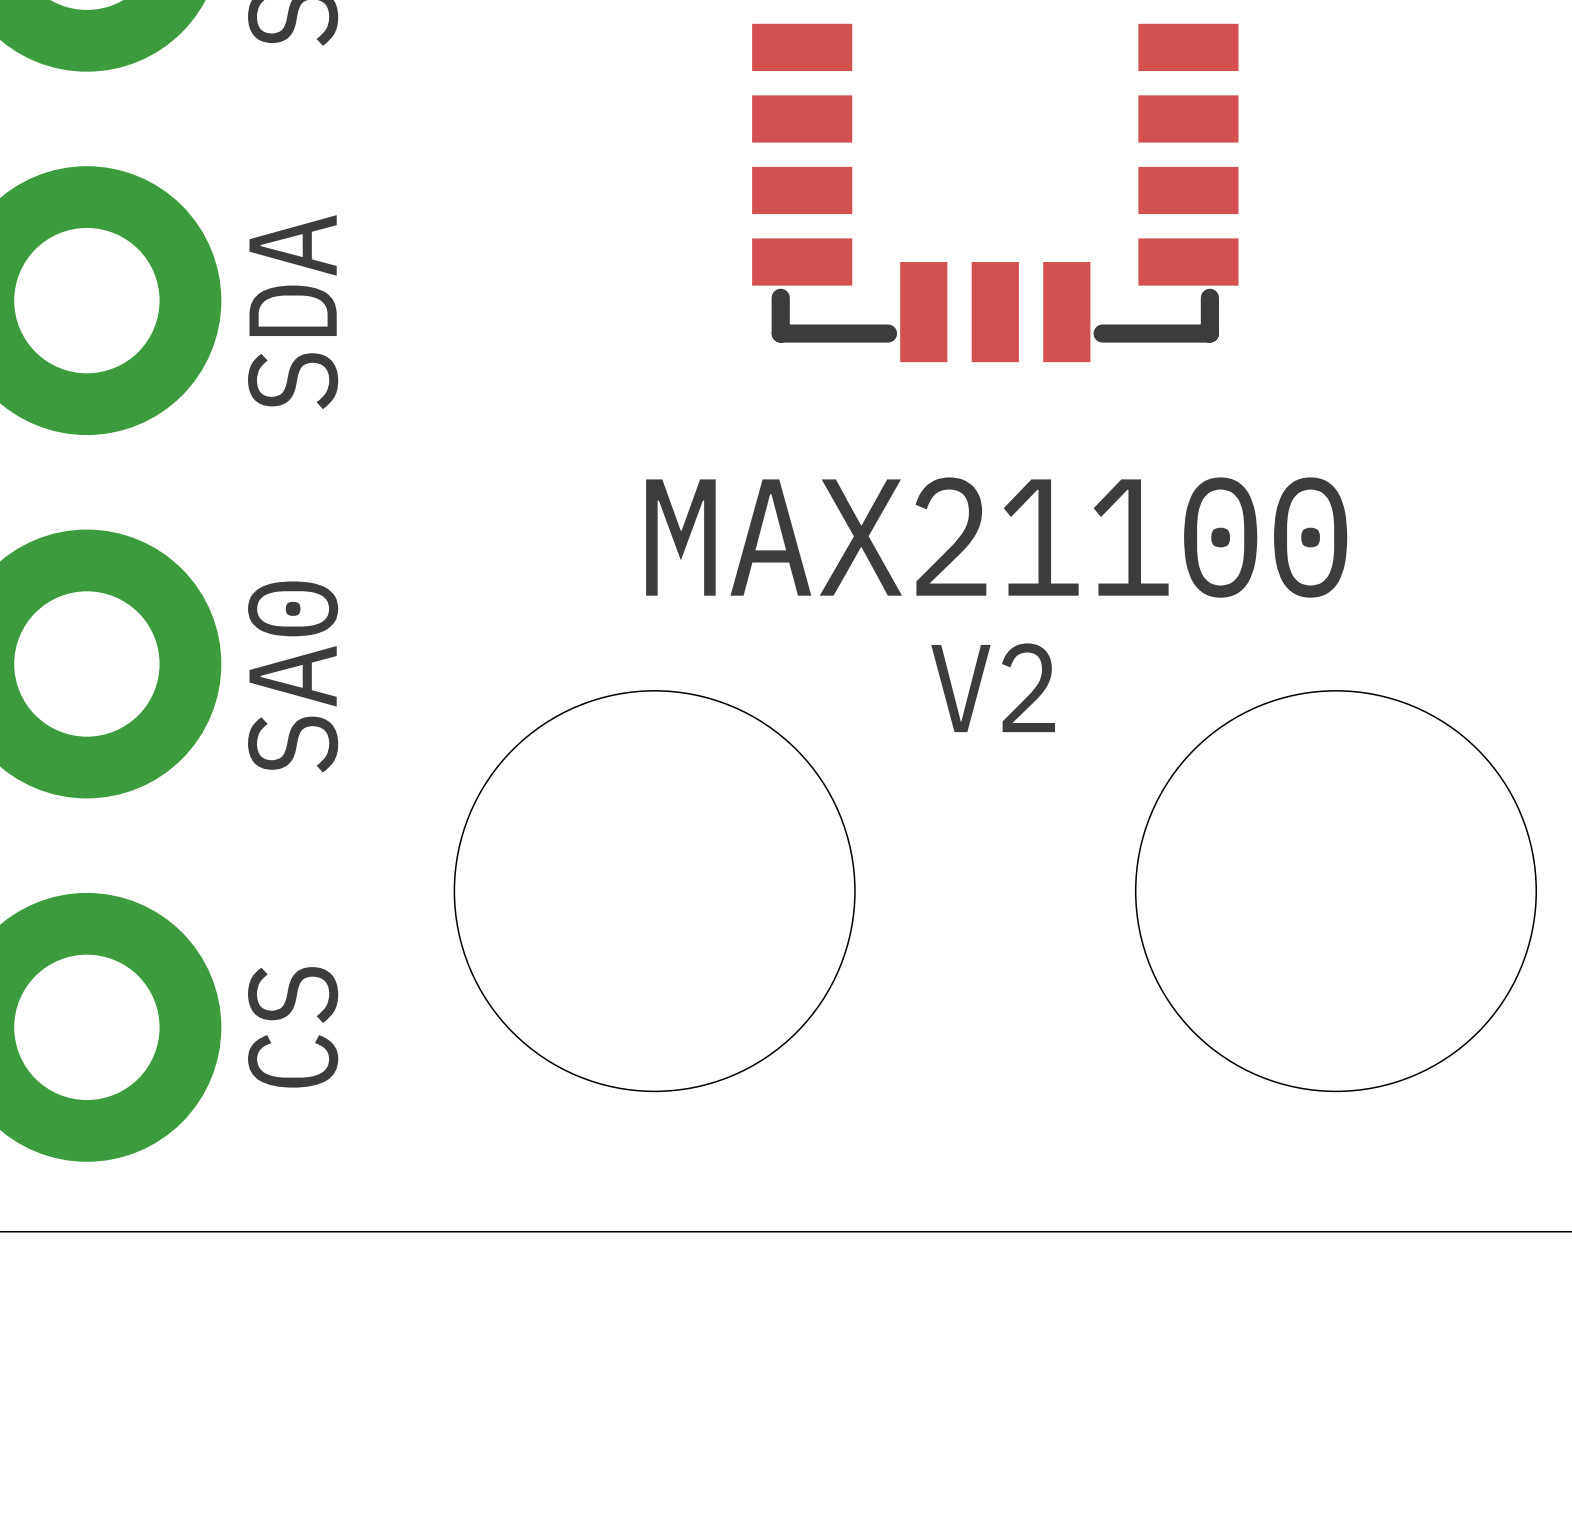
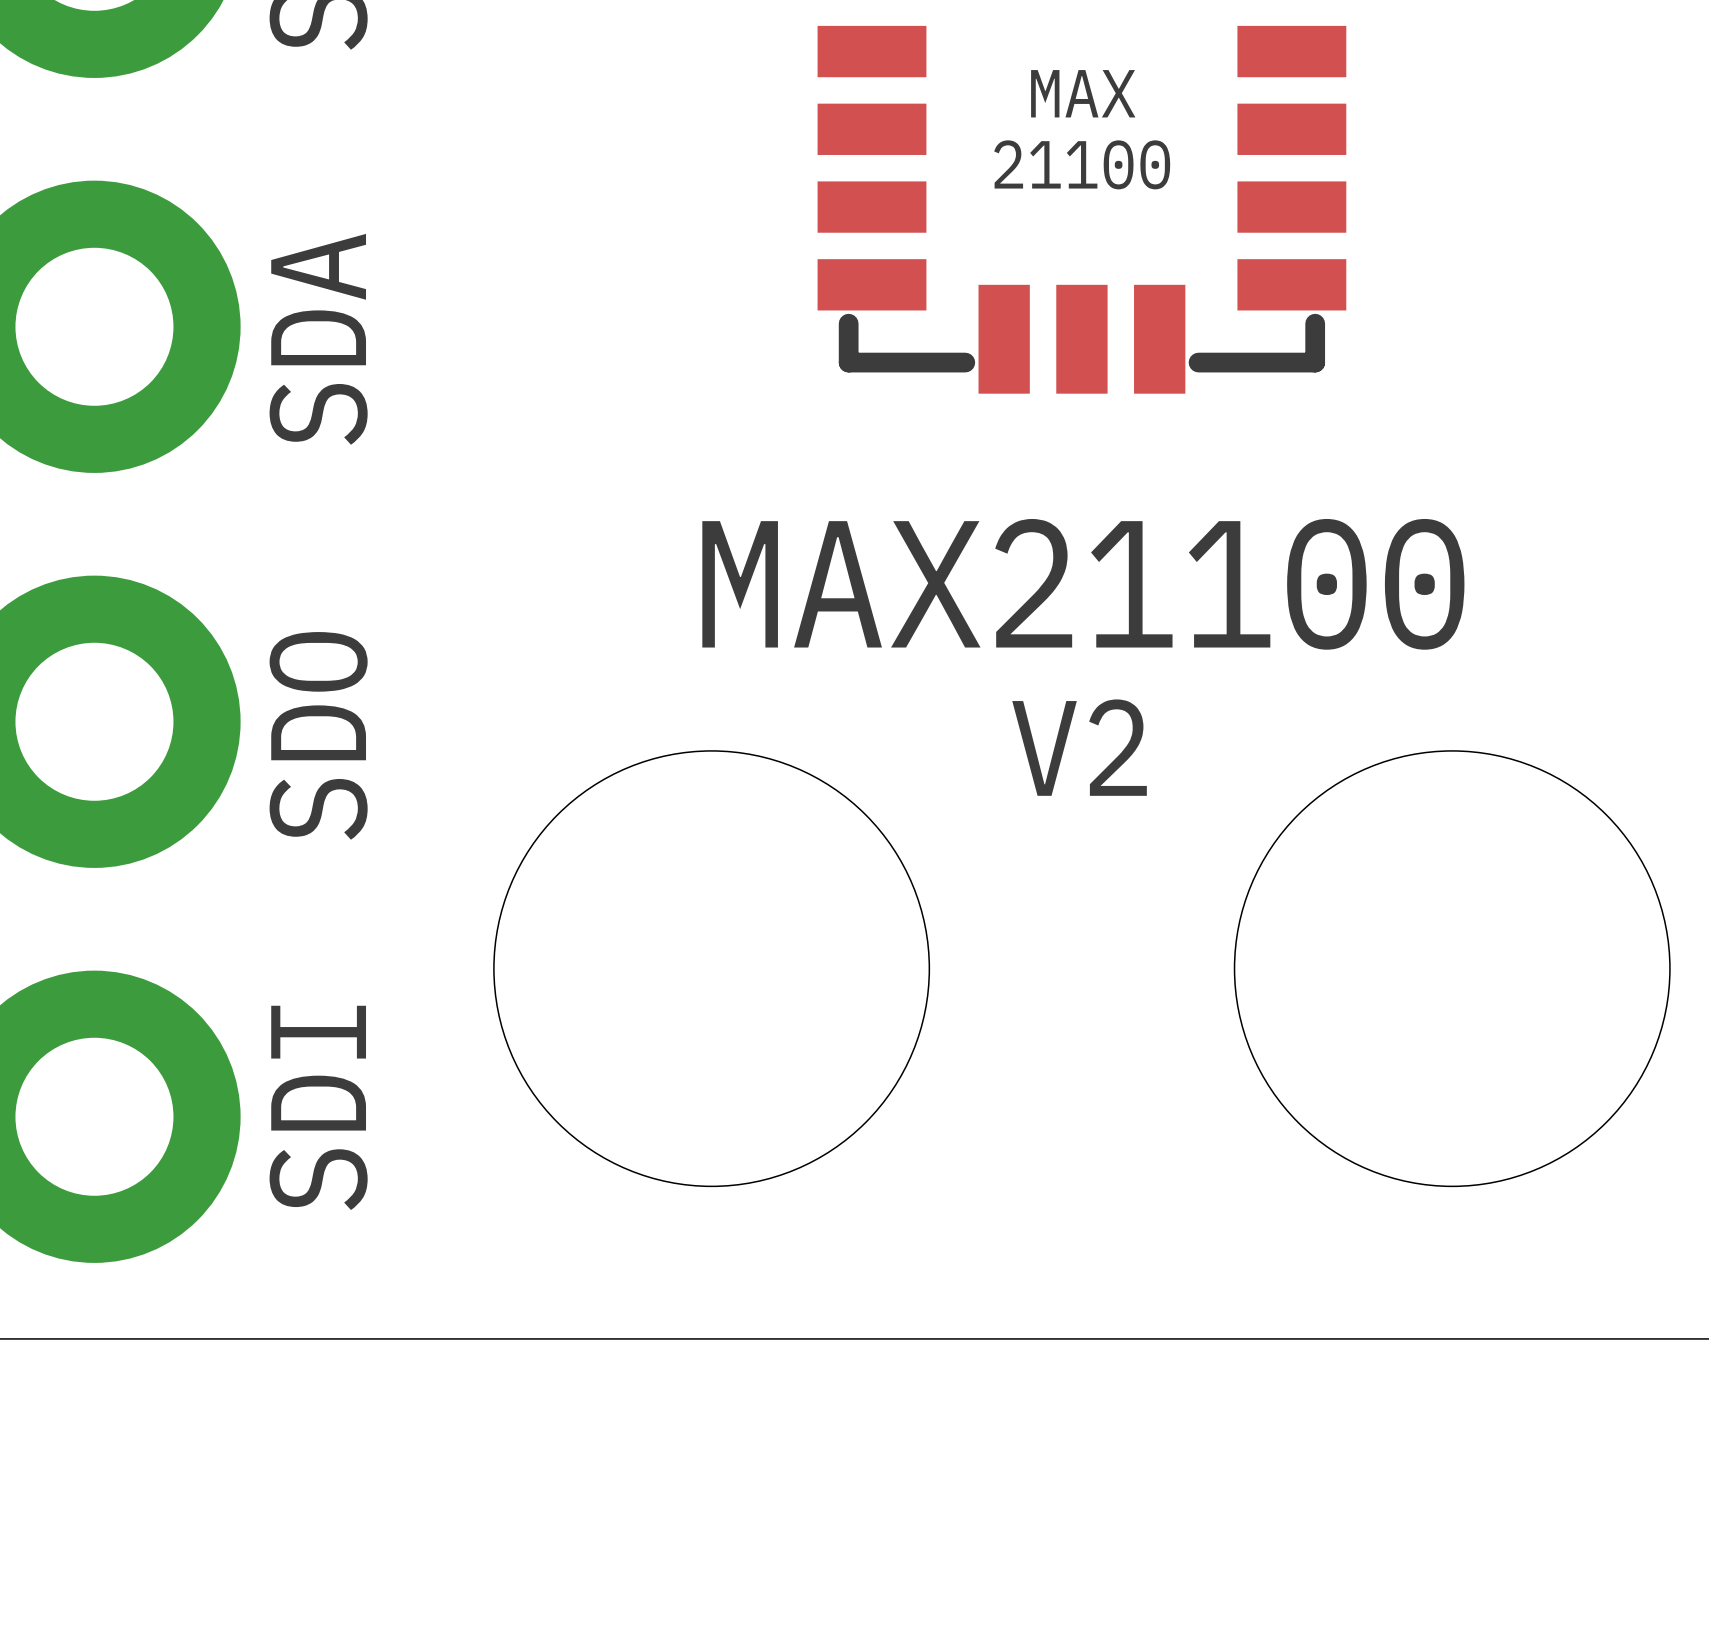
part text: none -> MAX (1083, 93)
part text: none -> 21100 (1082, 164)
text: SA0 (293, 676) -> SDO (318, 735)
text: CS (293, 1027) -> SDI (318, 1107)

